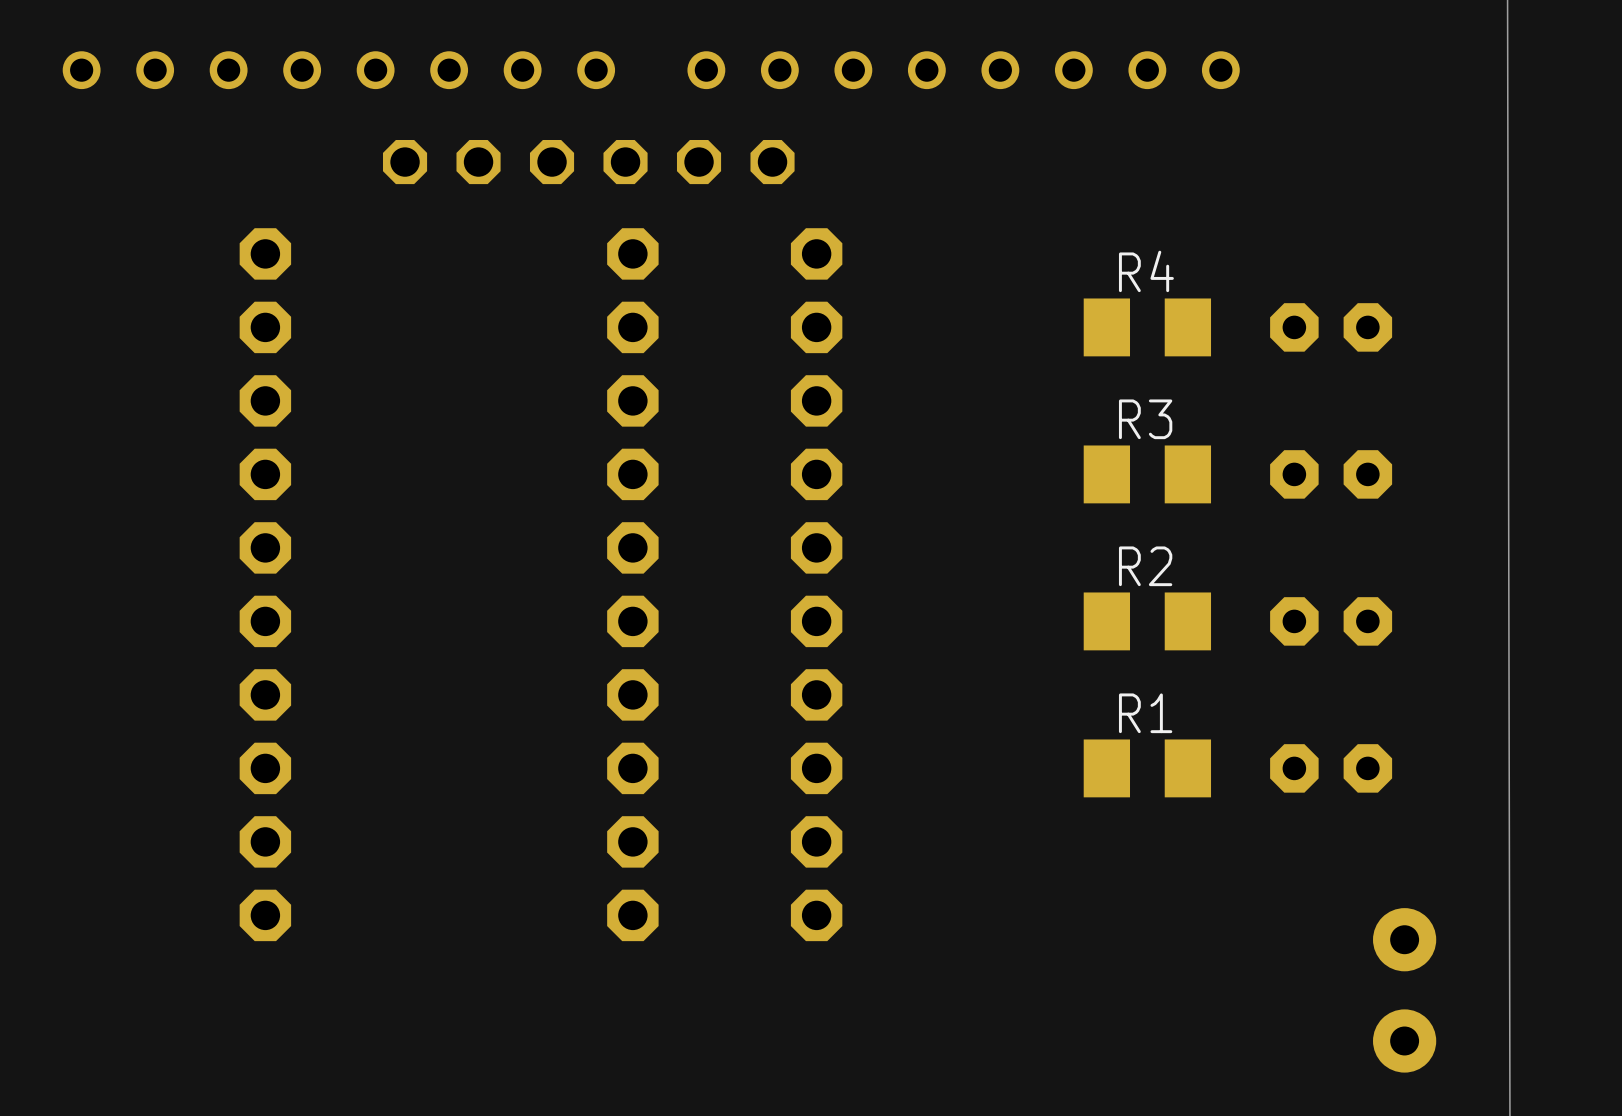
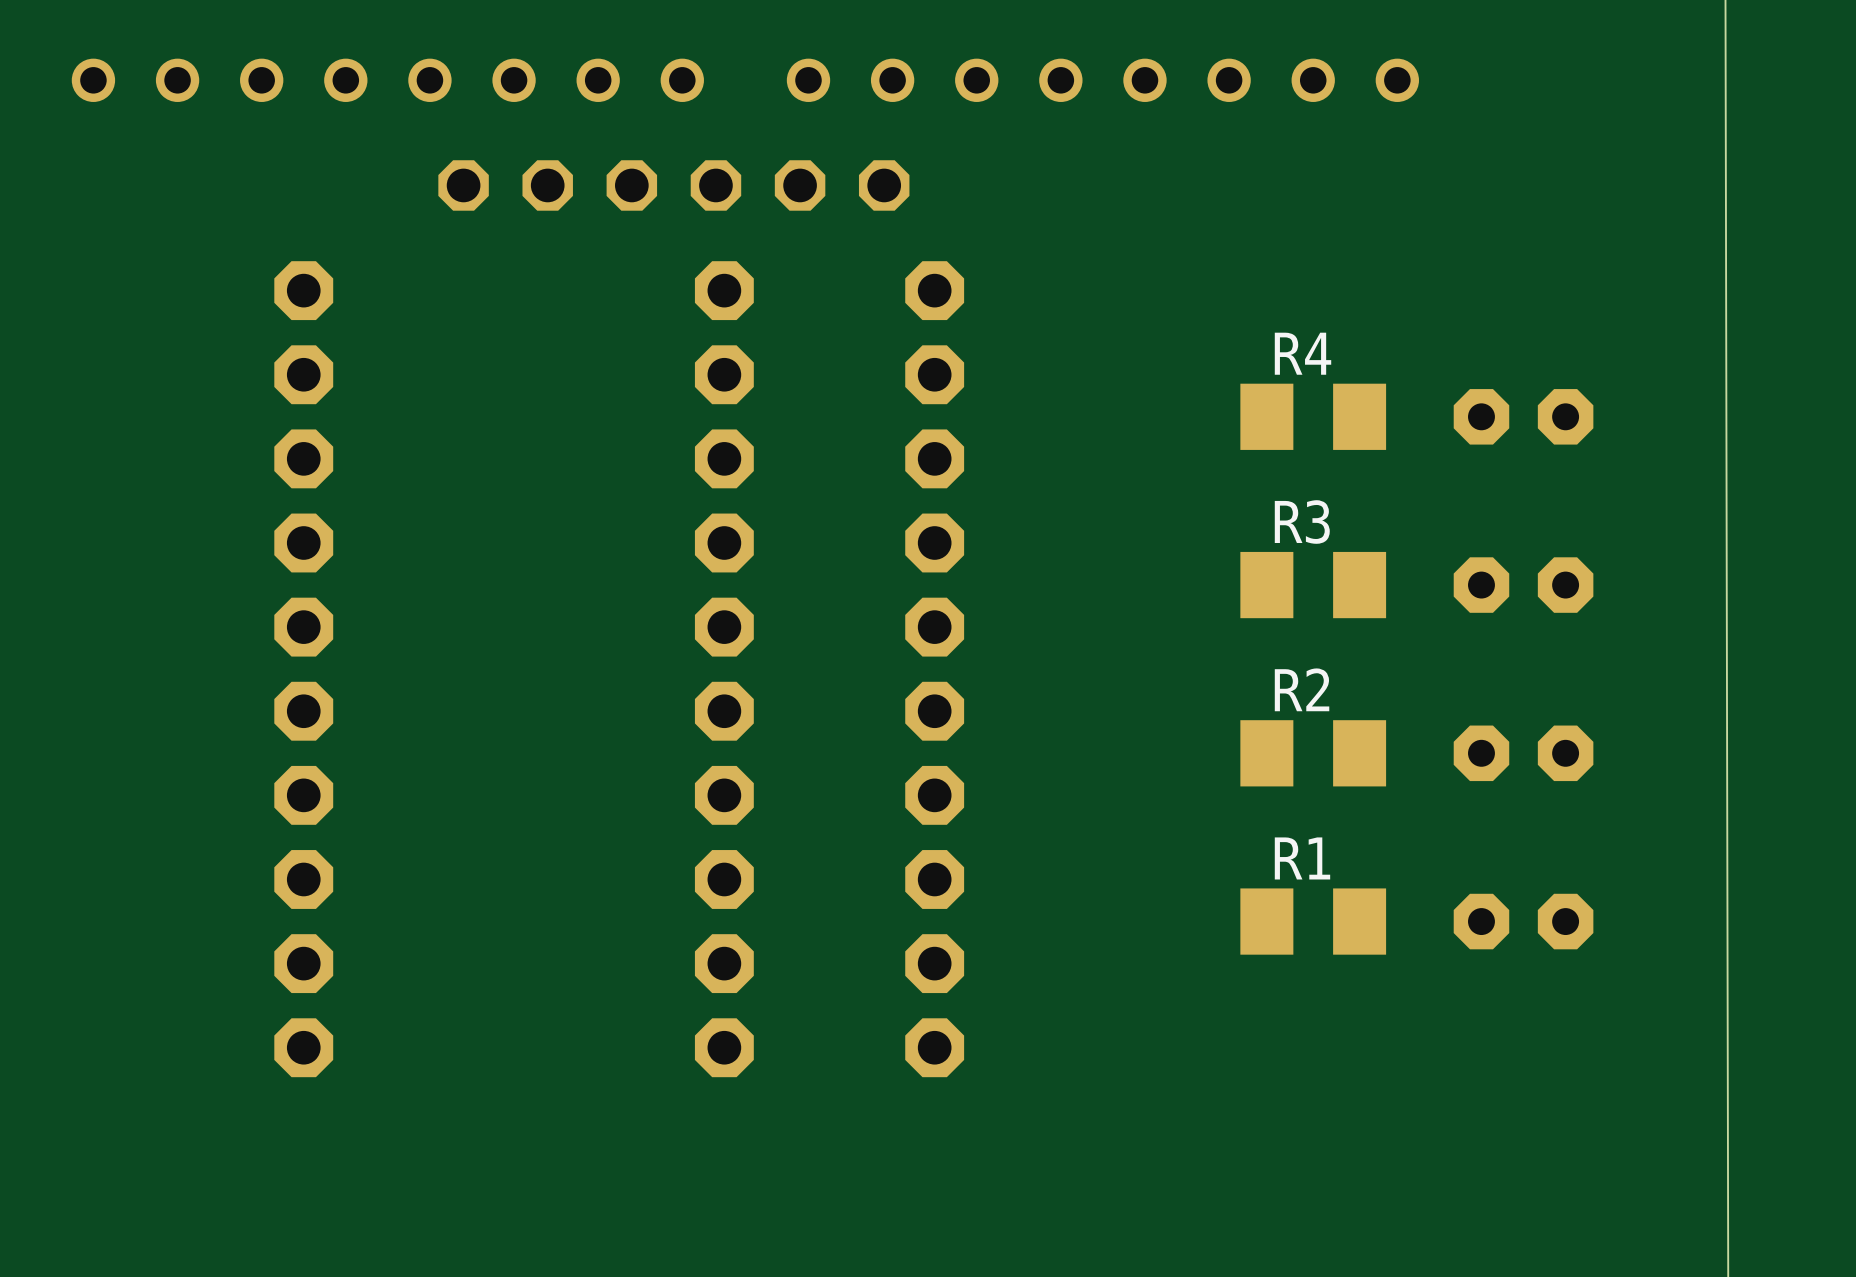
R4 position: (1147, 327) -> (1313, 416)
part position: (1331, 327) -> (1523, 416)
R3 position: (1147, 474) -> (1313, 585)
part position: (1331, 474) -> (1523, 585)
R2 position: (1147, 621) -> (1313, 753)
part position: (1331, 621) -> (1523, 753)
R1 position: (1147, 768) -> (1313, 921)
part position: (1331, 768) -> (1523, 921)
part: (1404, 990) -> none

